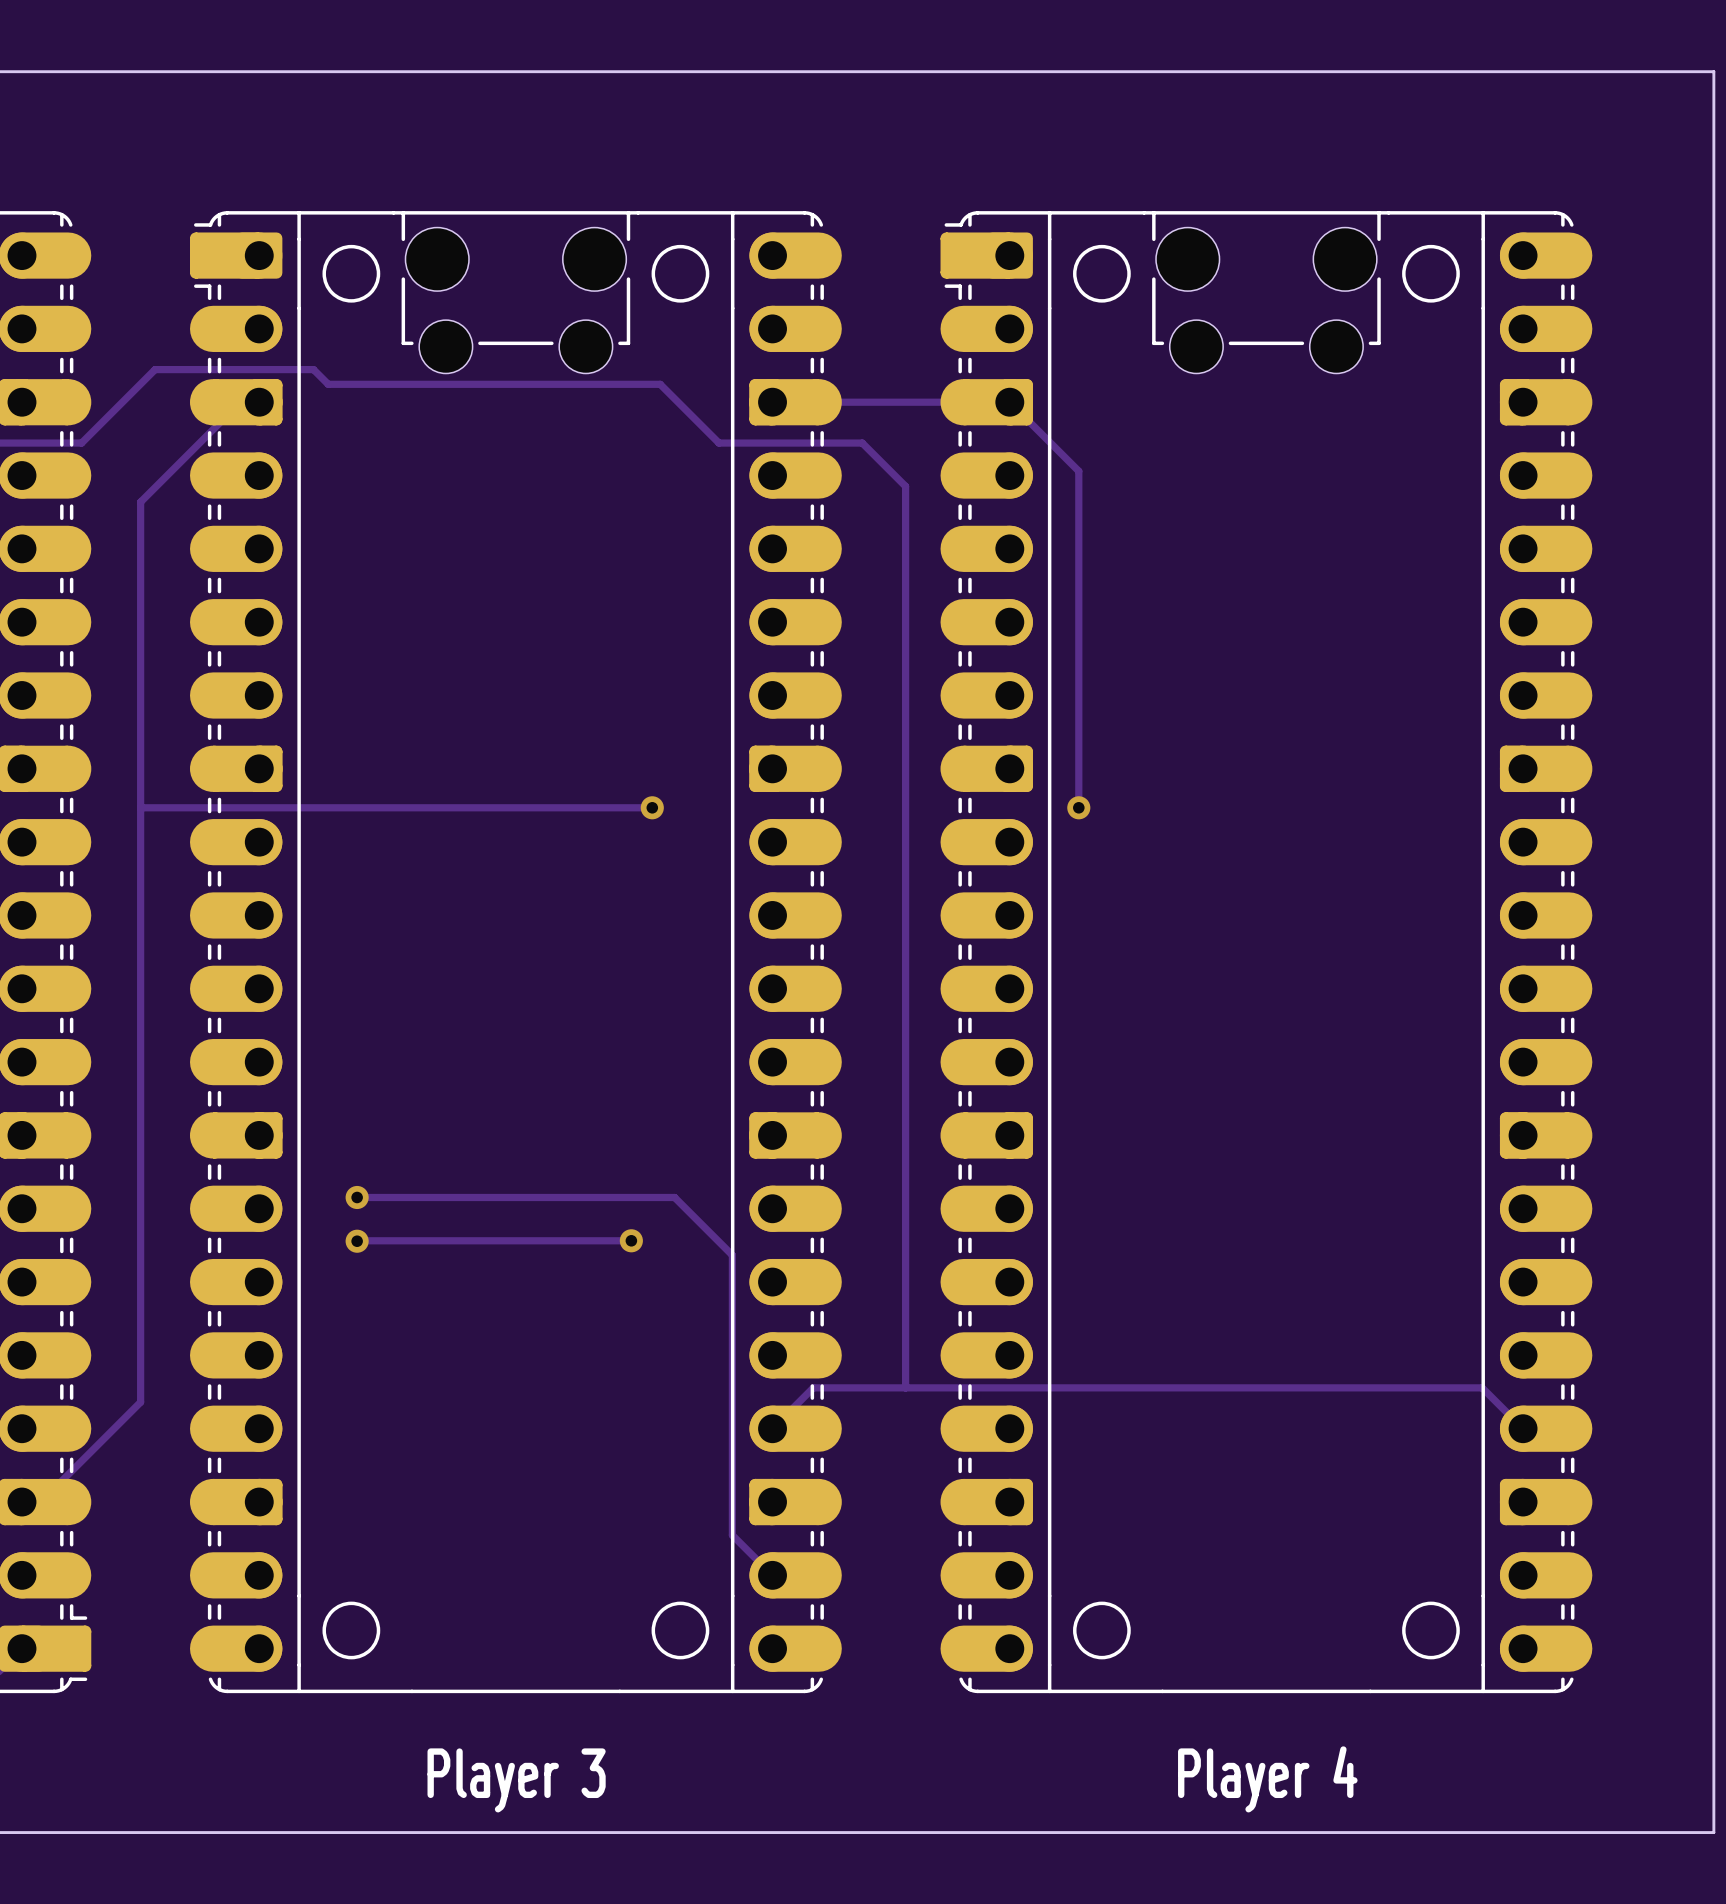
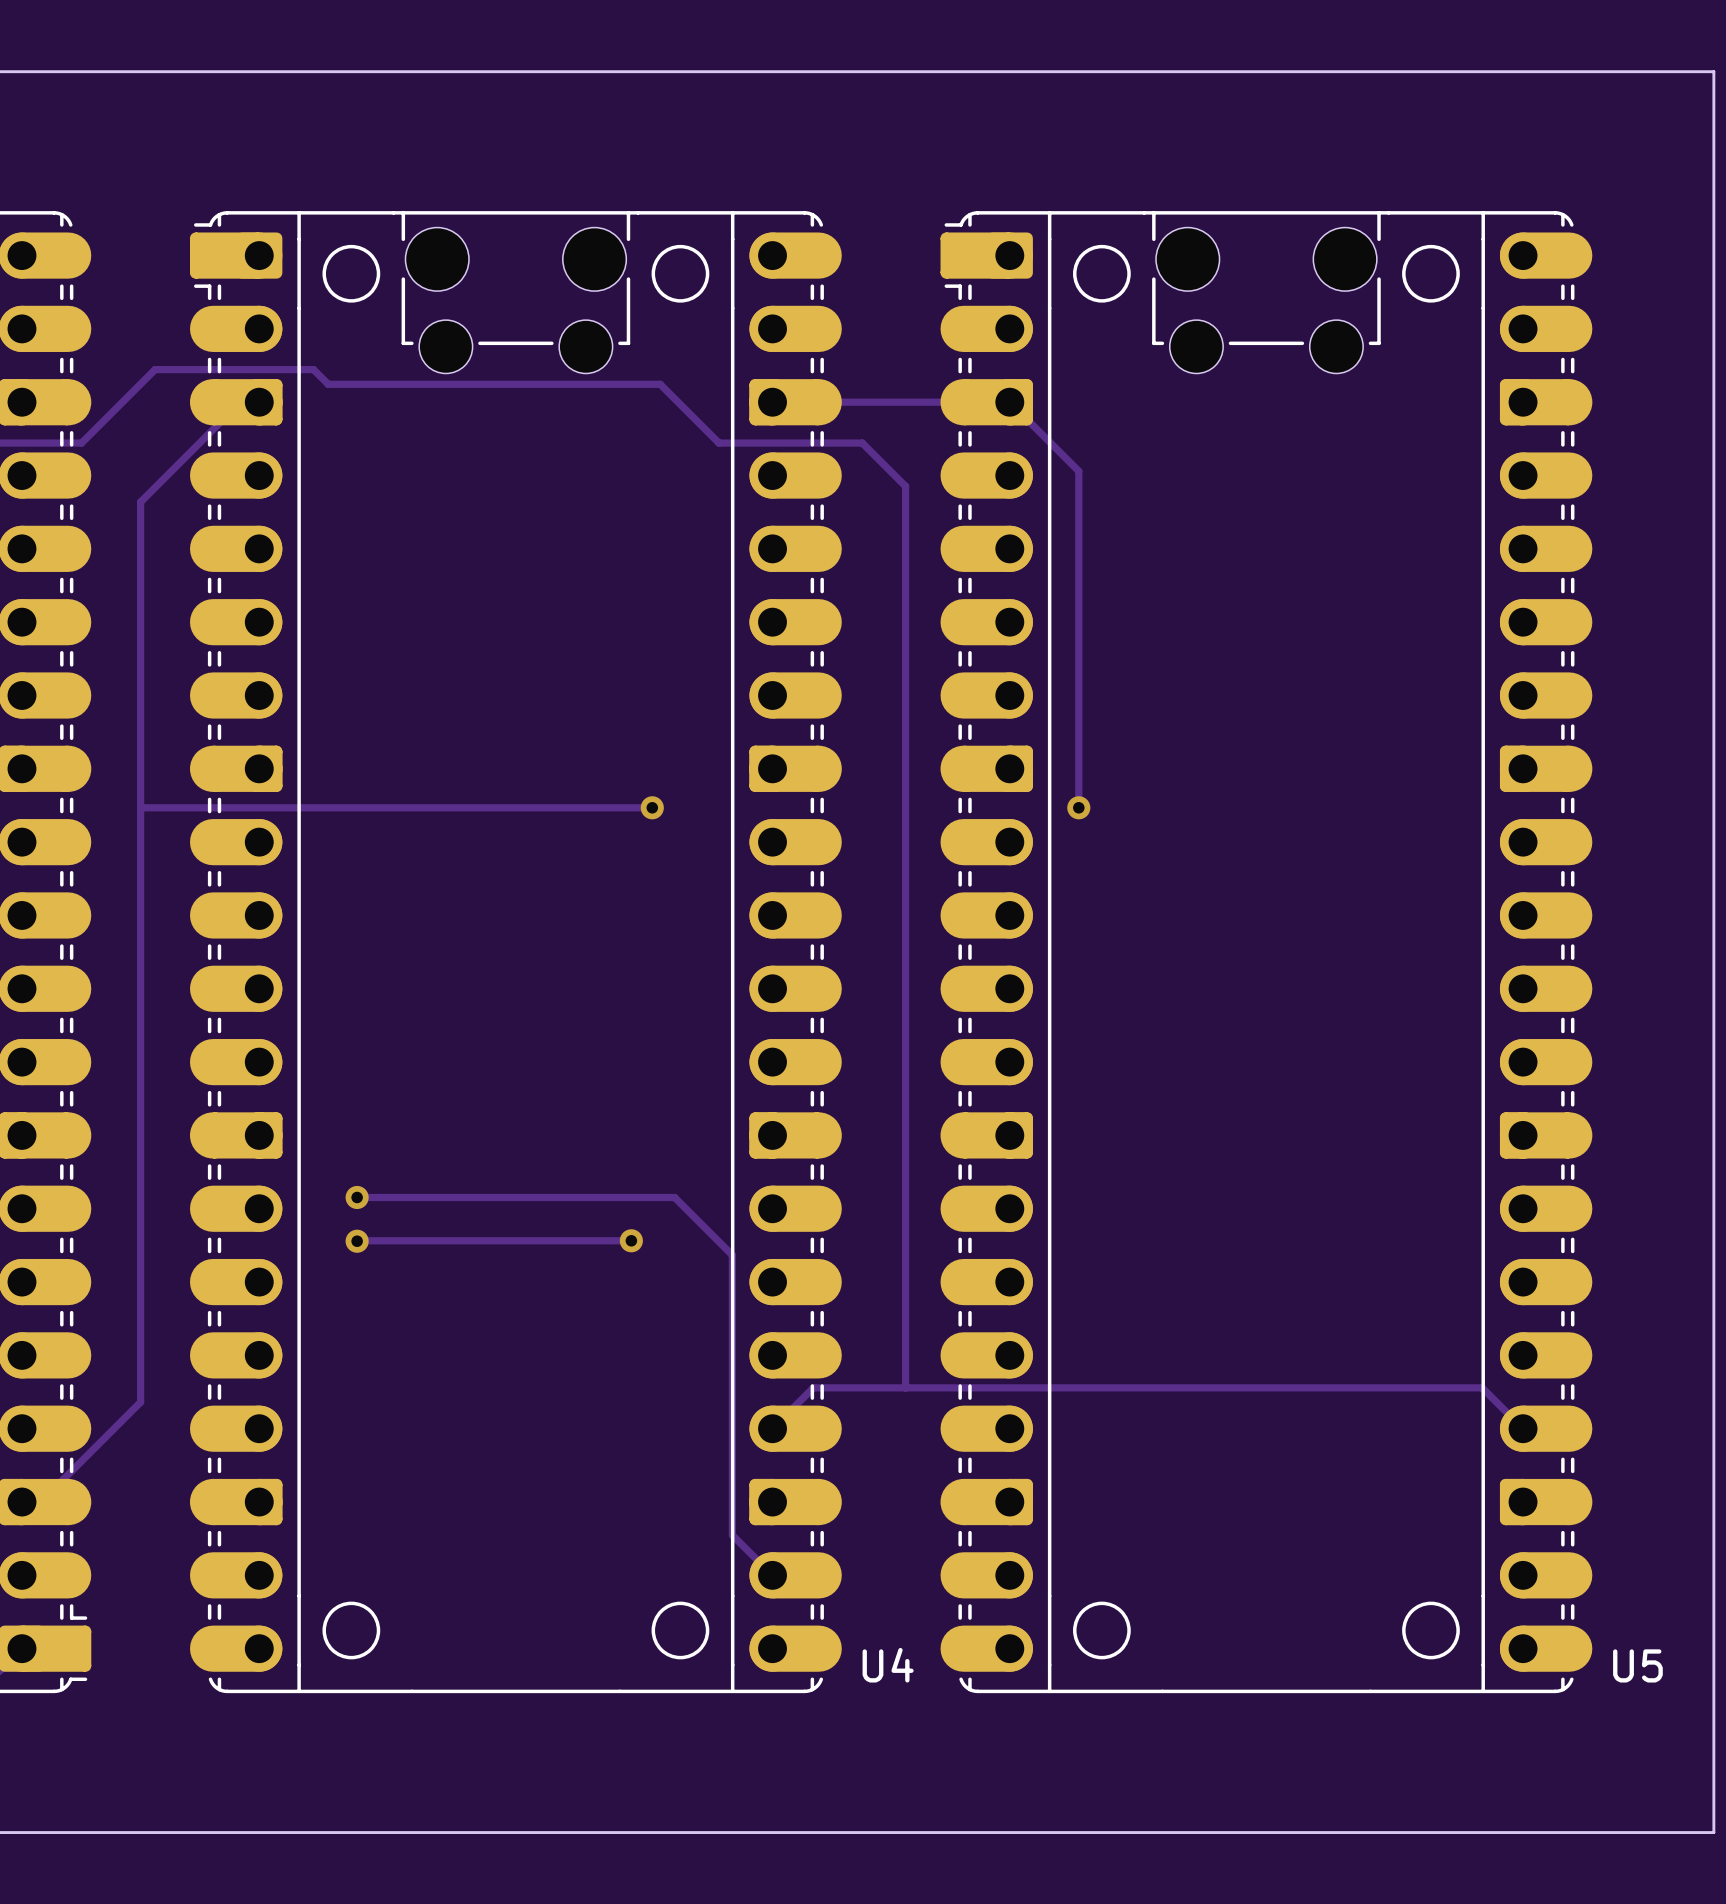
U4 name: none -> U4 (888, 1665)
U5 name: none -> U5 (1637, 1665)
text: Player 4 (1267, 1779) -> none
text: Player 3 (516, 1780) -> none

